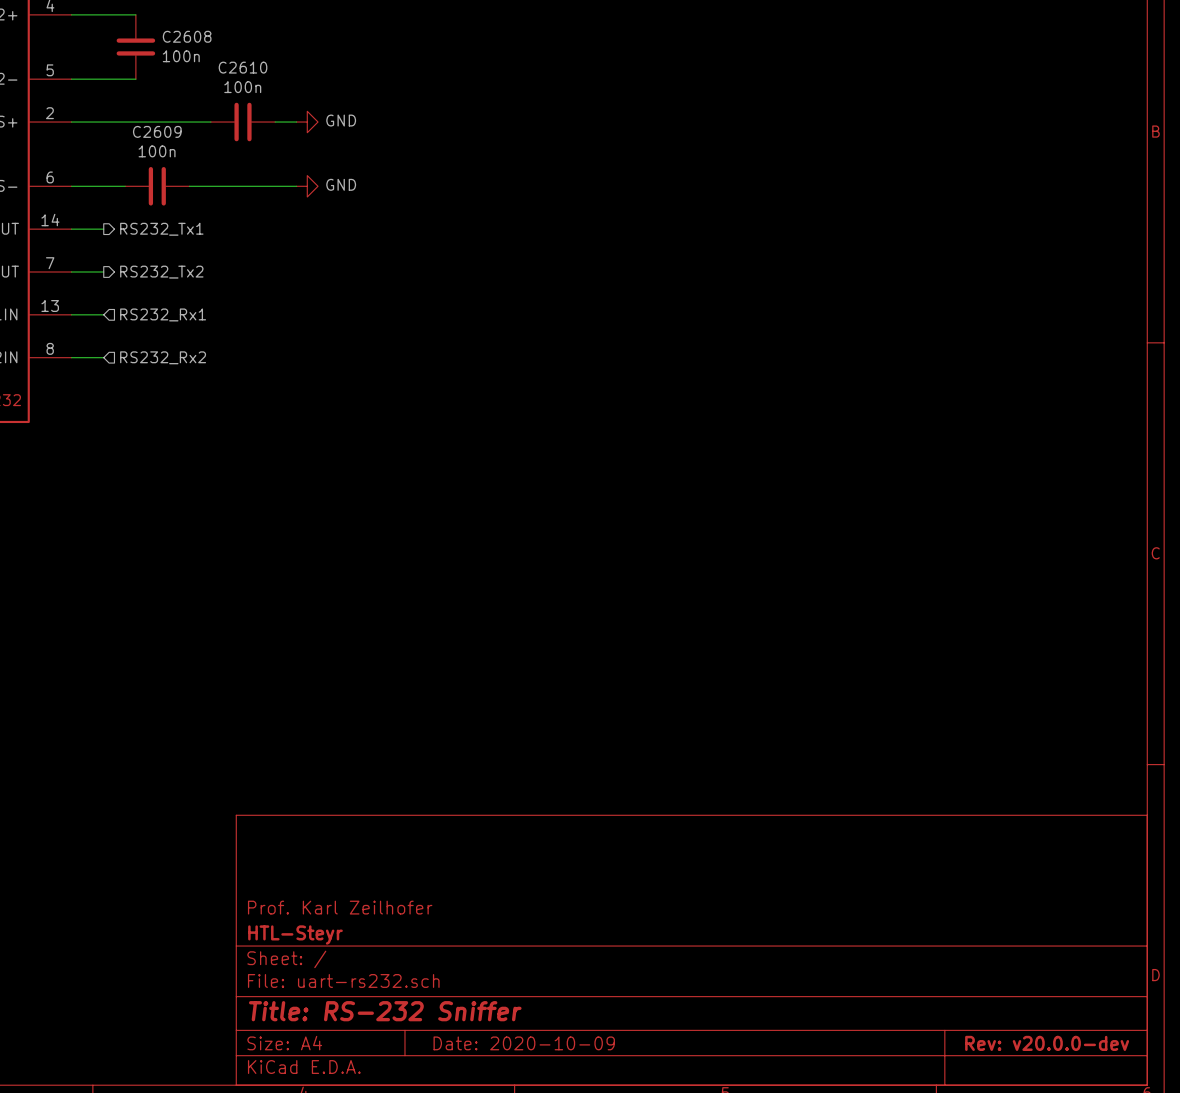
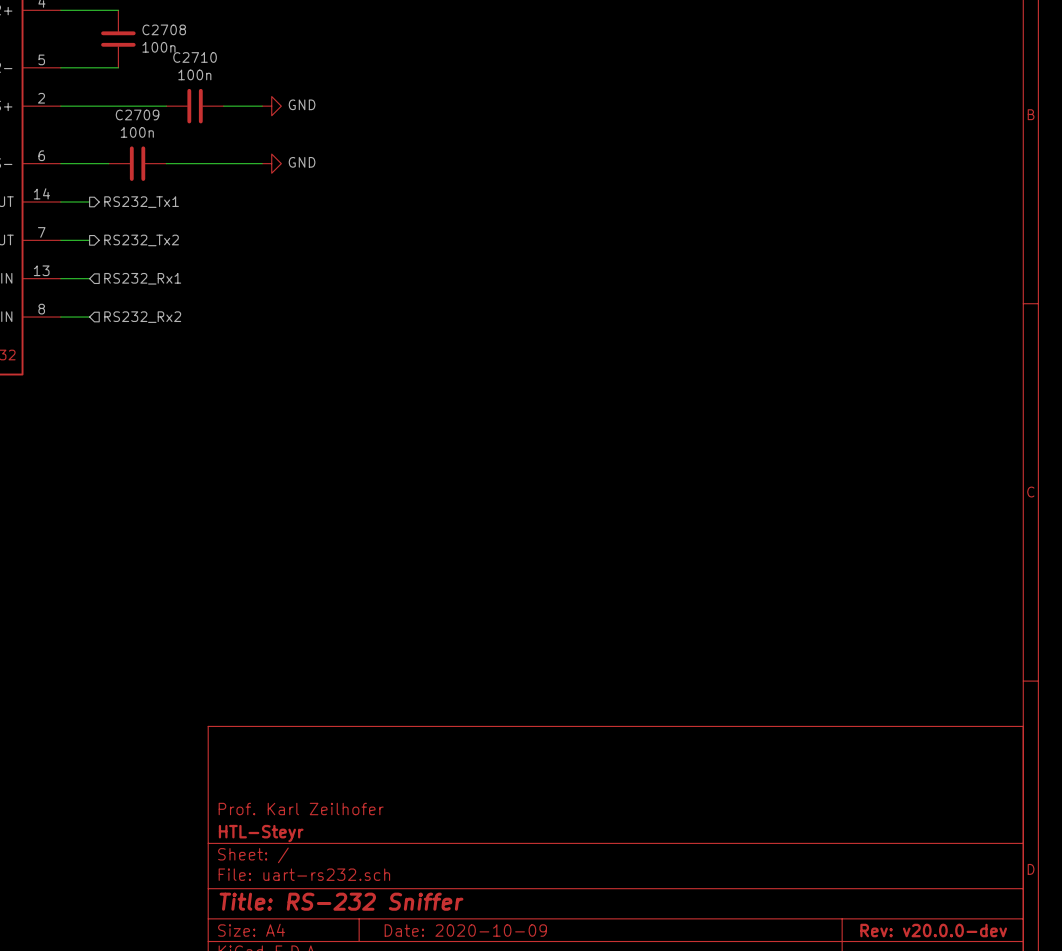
C2608 name: C2608 (187, 36) -> C2708 (164, 29)
C2710: none -> 100n (195, 106)
C2610: 100n (243, 122) -> none
C2609 name: C2609 (157, 131) -> C2709 (137, 114)

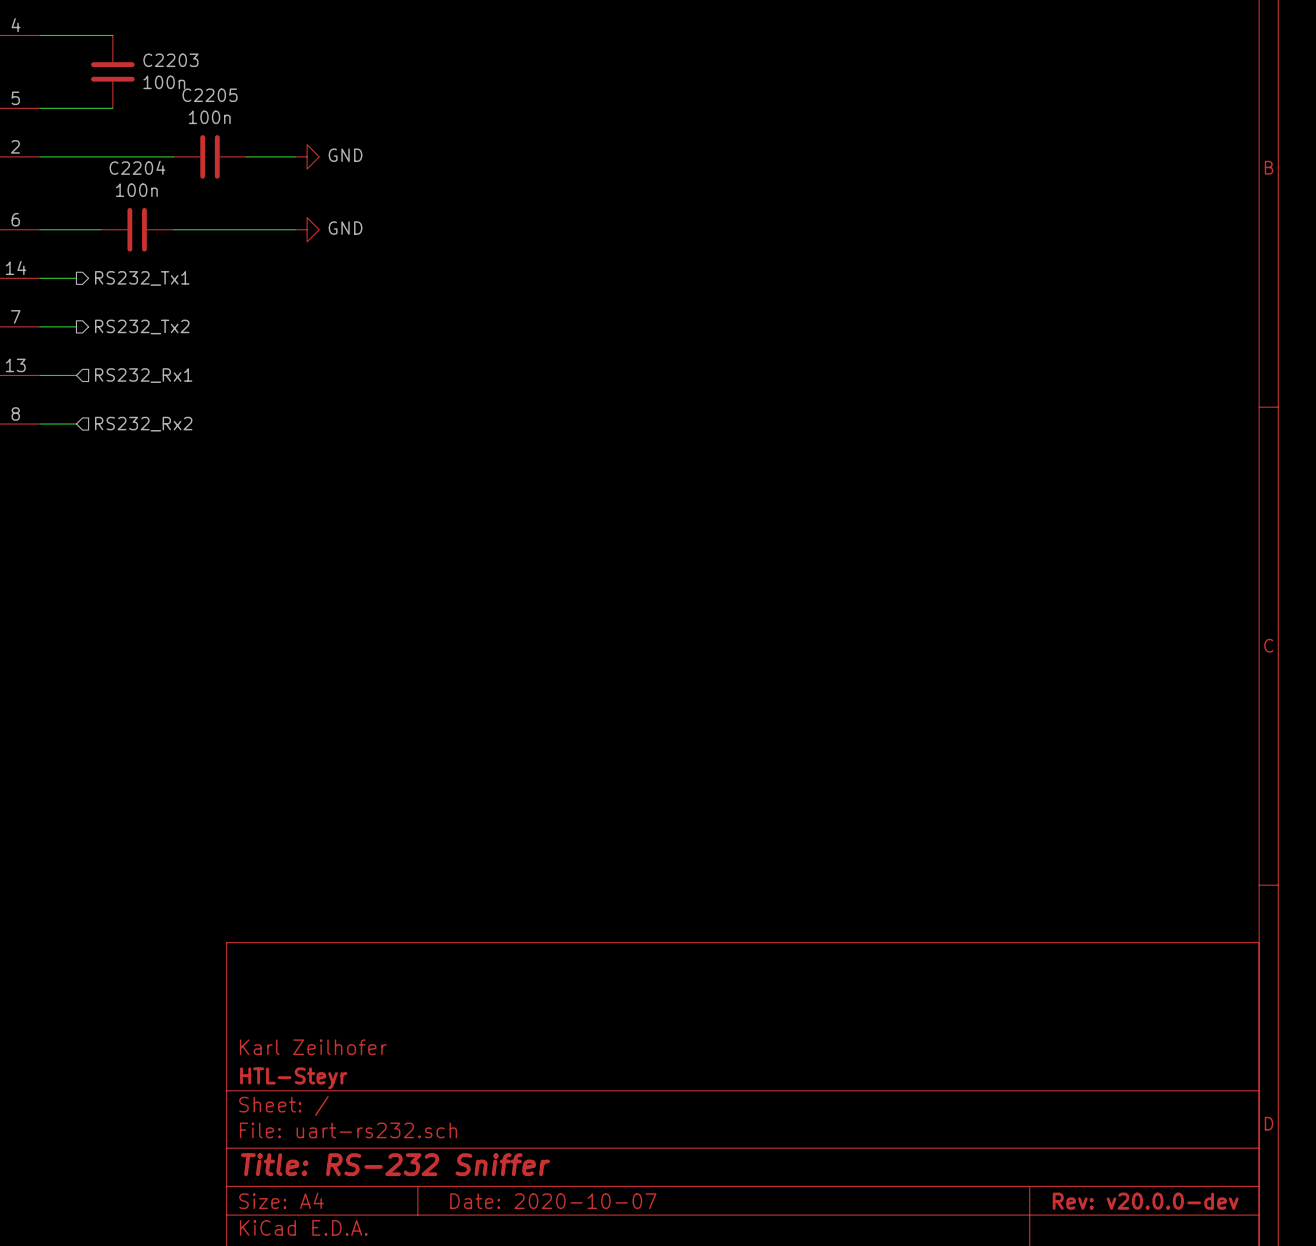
C2708 name: C2708 (164, 29) -> C2203 (170, 60)
C2710 name: C2710 (195, 57) -> C2205 (210, 95)
C2709 name: C2709 (137, 114) -> C2204 (137, 167)
title block: Prof. Karl Zeilhofer (301, 809) -> Karl Zeilhofer (313, 1047)
title block: Date: 2020-10-09 (465, 930) -> Date: 2020-10-07 (553, 1201)

